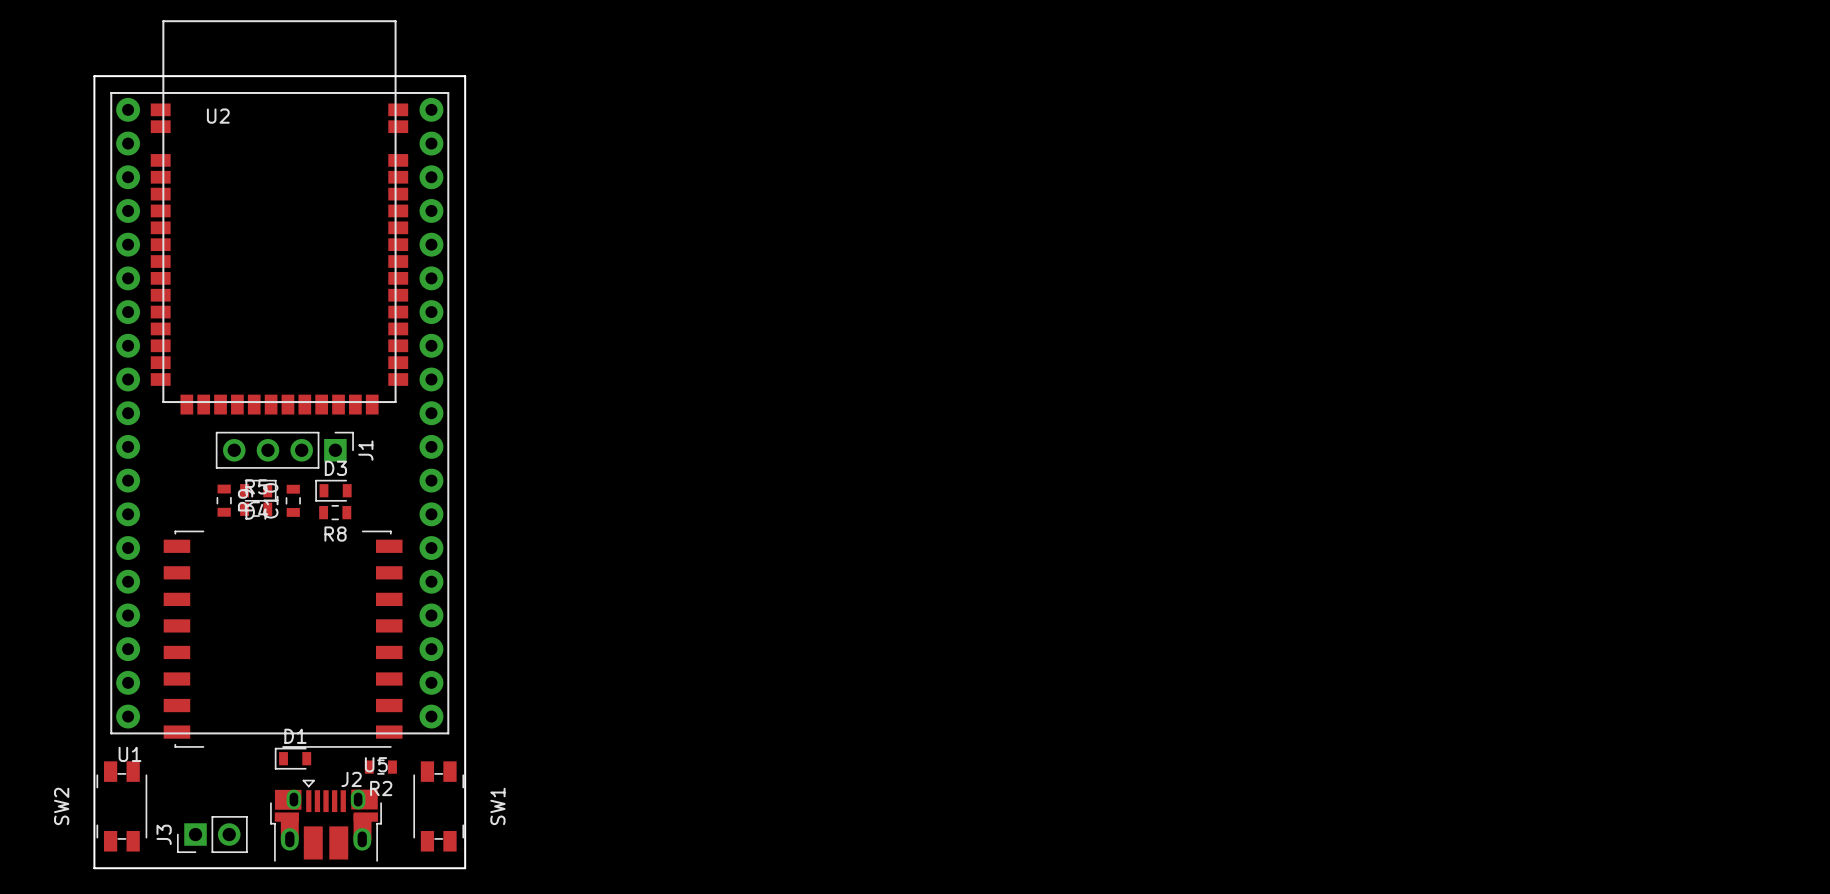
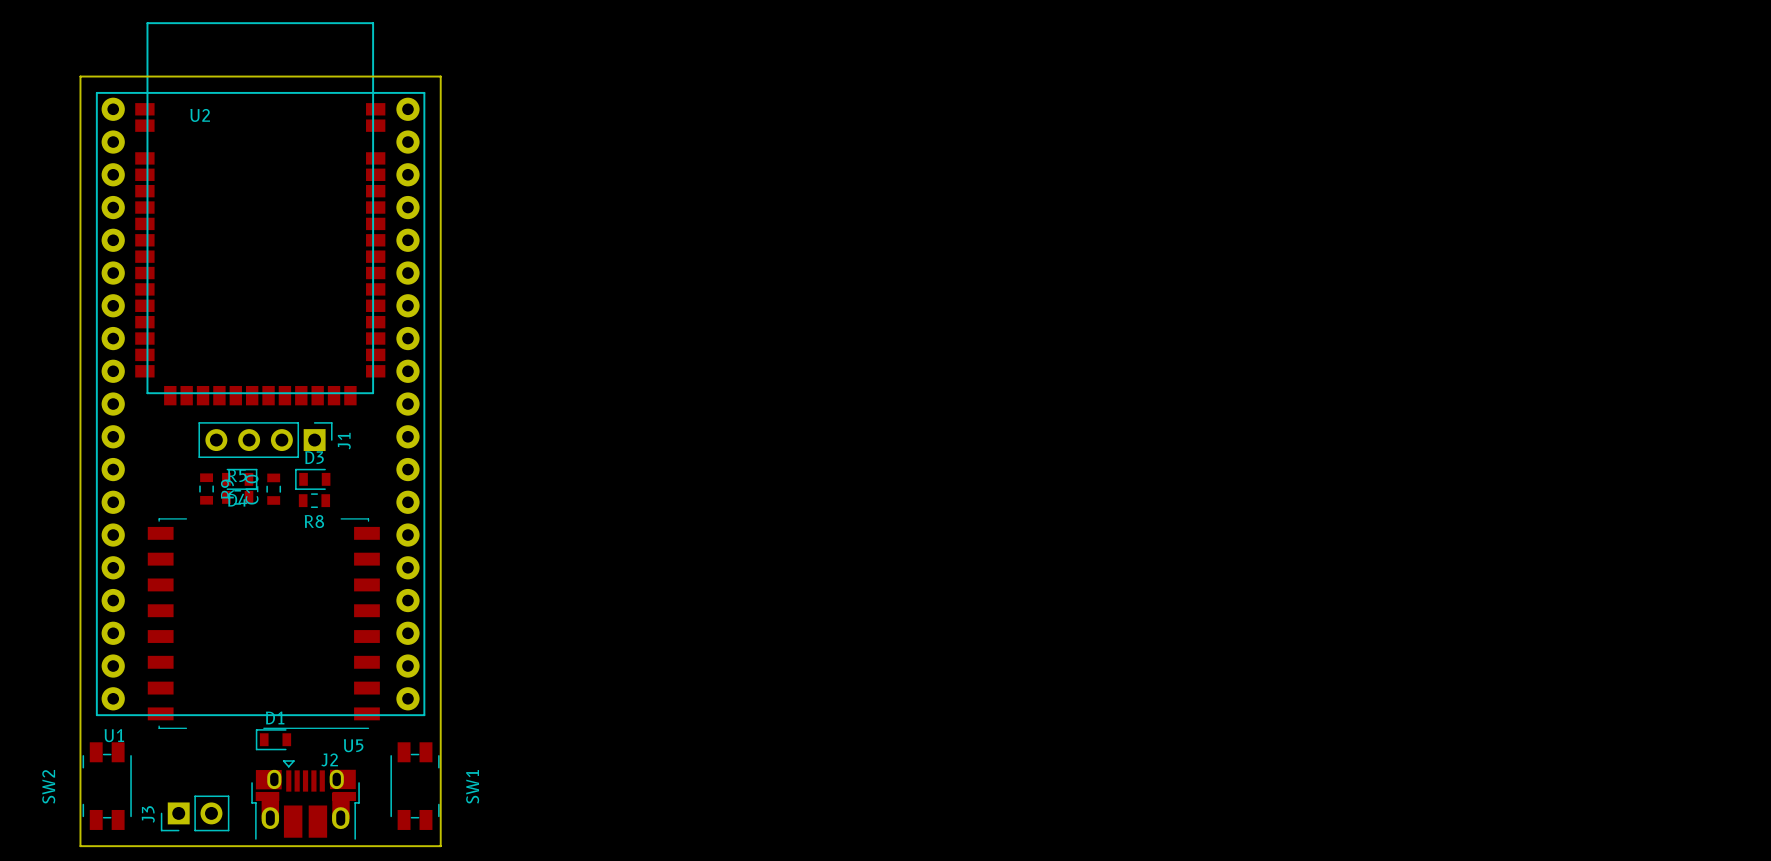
R2: (380, 767) -> none

